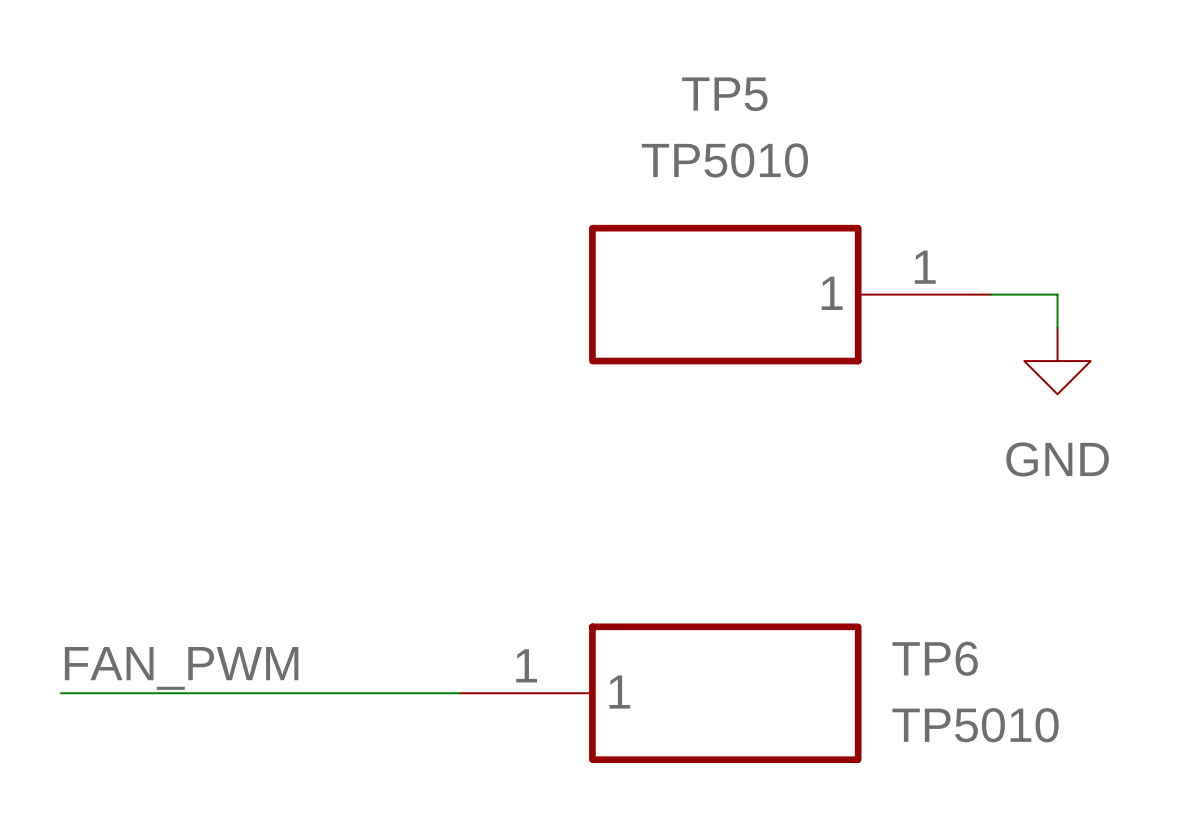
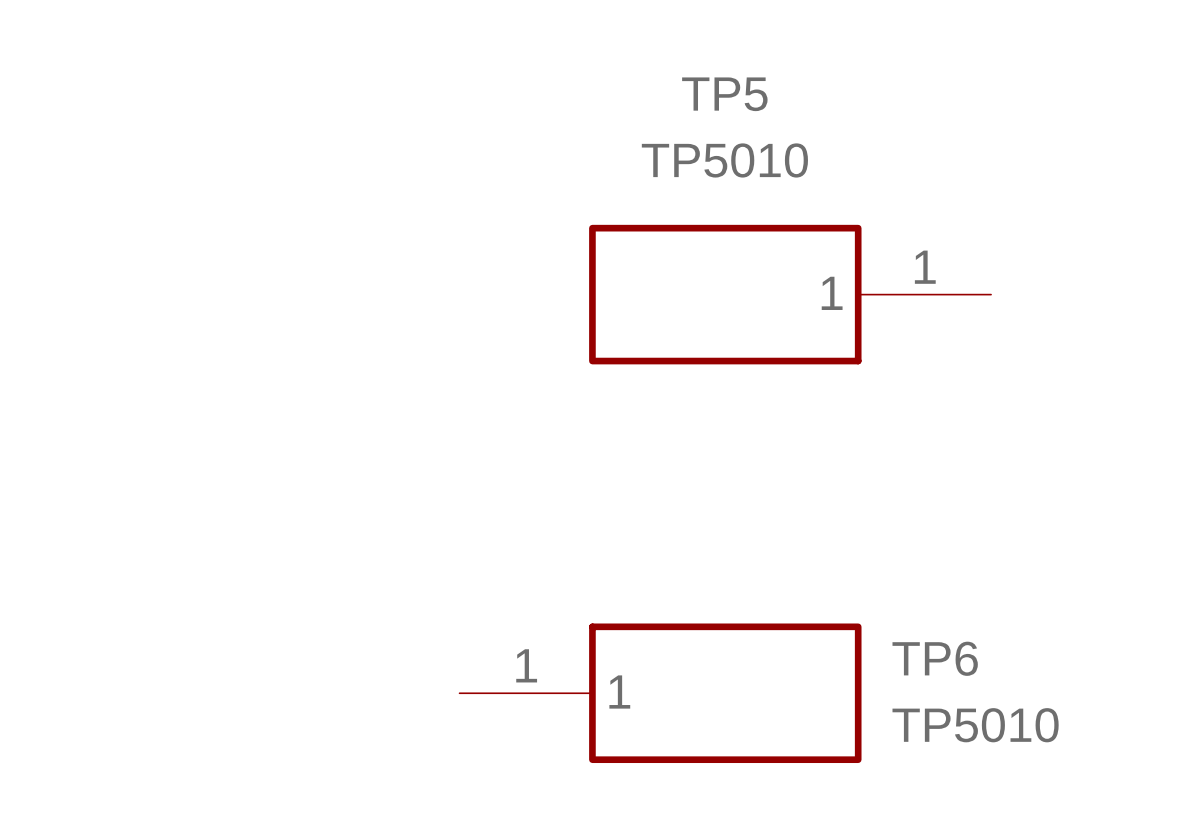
wire: (991, 294) (1057, 294) (1057, 327) -> none
power symbol: GND (1057, 361) -> none
label: FAN_PWM (181, 668) -> none
wire: (60, 693) (459, 693) -> none

